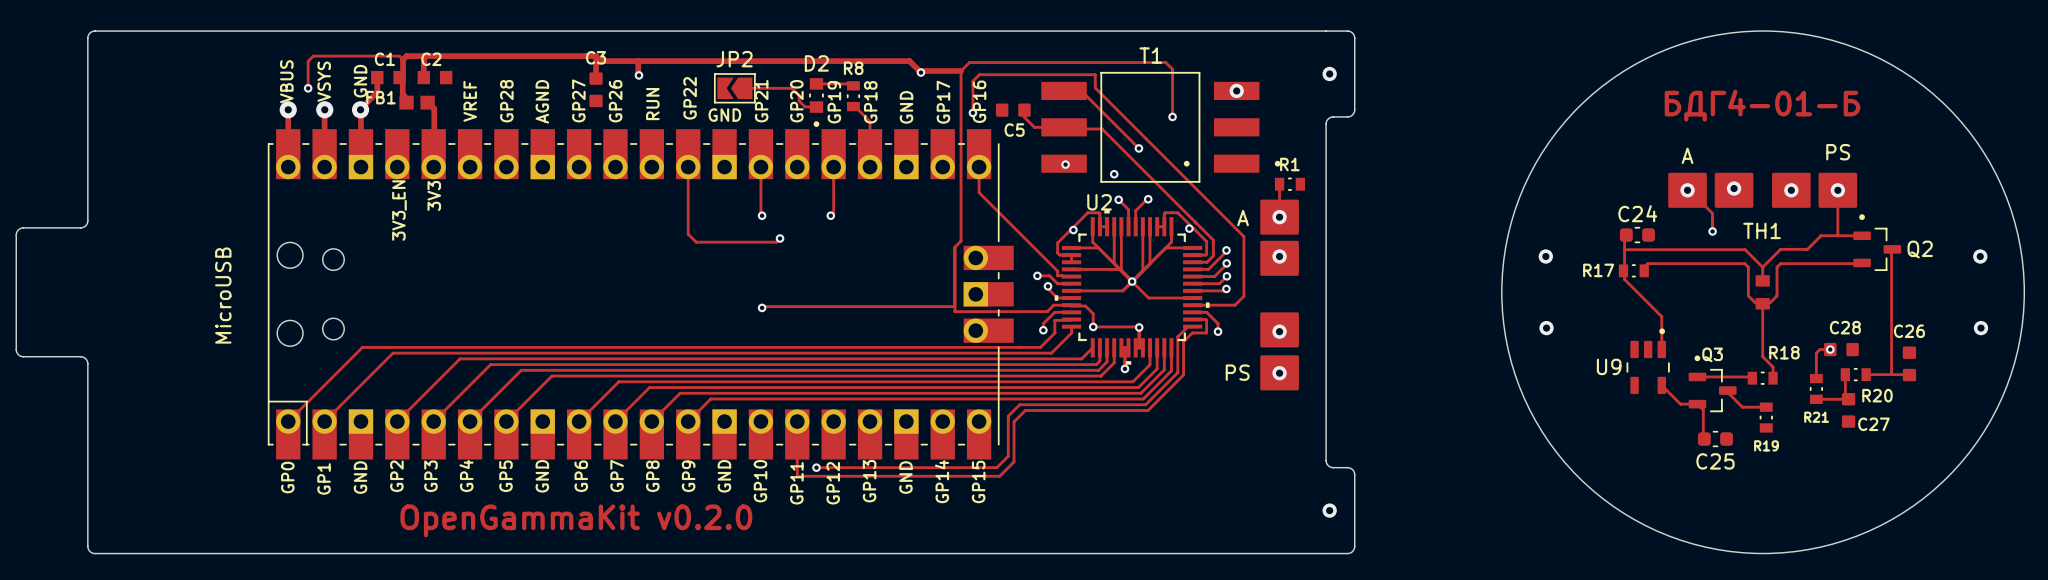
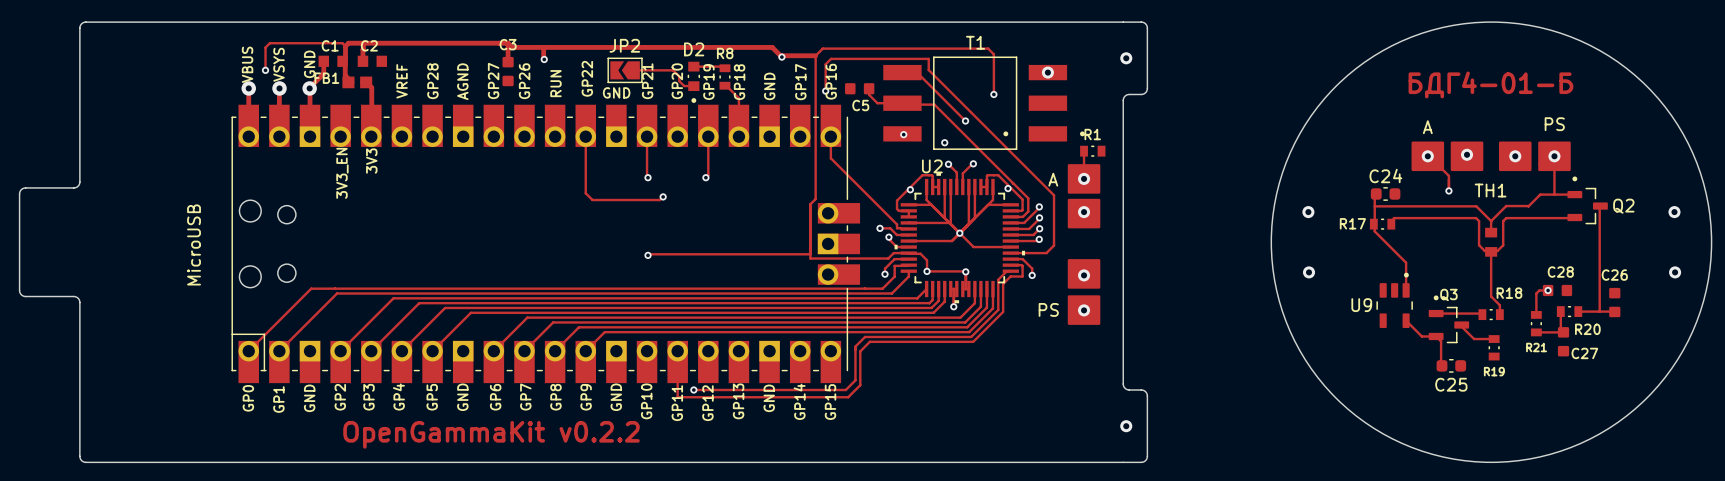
text: OpenGammaKit v0.2.0 (576, 520) -> OpenGammaKit v0.2.2 (491, 434)

